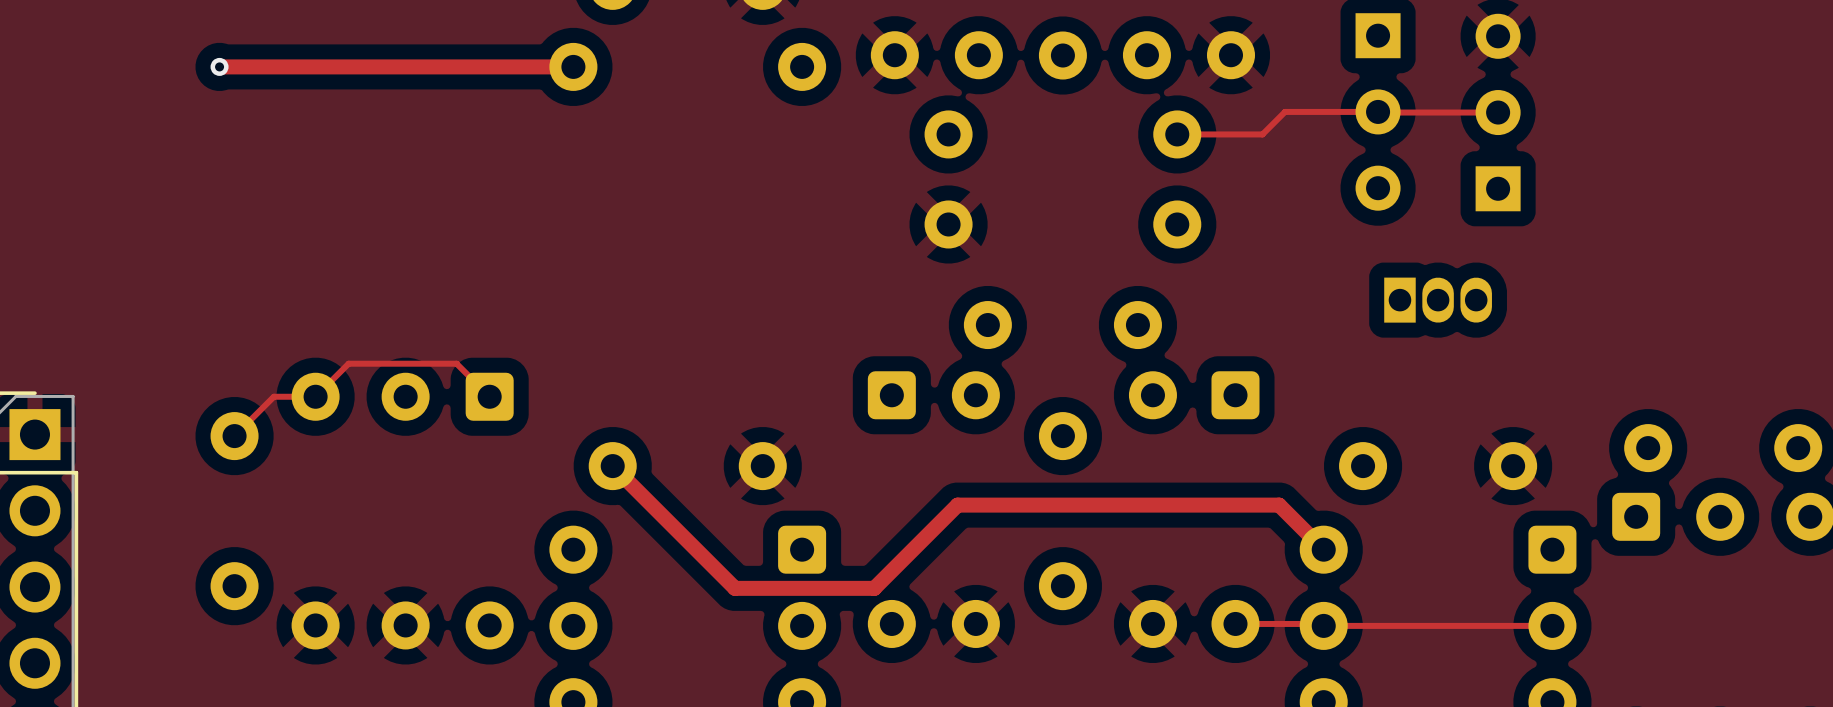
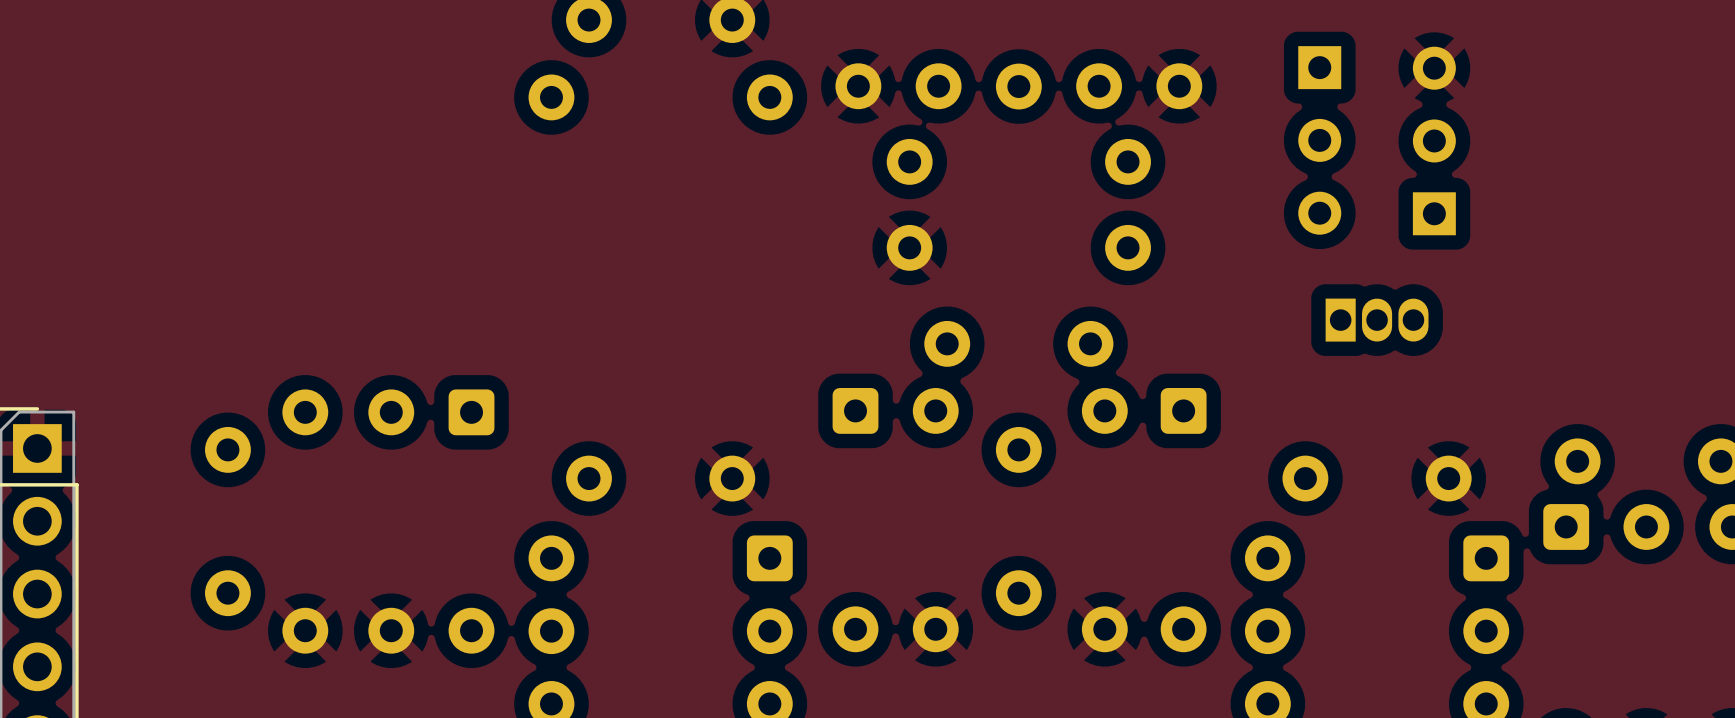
track: (219, 66) (573, 66) -> none
via: (219, 66) -> none
track: (1498, 112) (1285, 111) (1262, 134) (1177, 134) -> none
track: (489, 396) (456, 363) (348, 363) (315, 396) (273, 396) (234, 436) -> none
track: (612, 466) (735, 588) (874, 588) (957, 505) (1279, 505) (1323, 549) -> none
track: (1235, 623) (1552, 625) -> none

